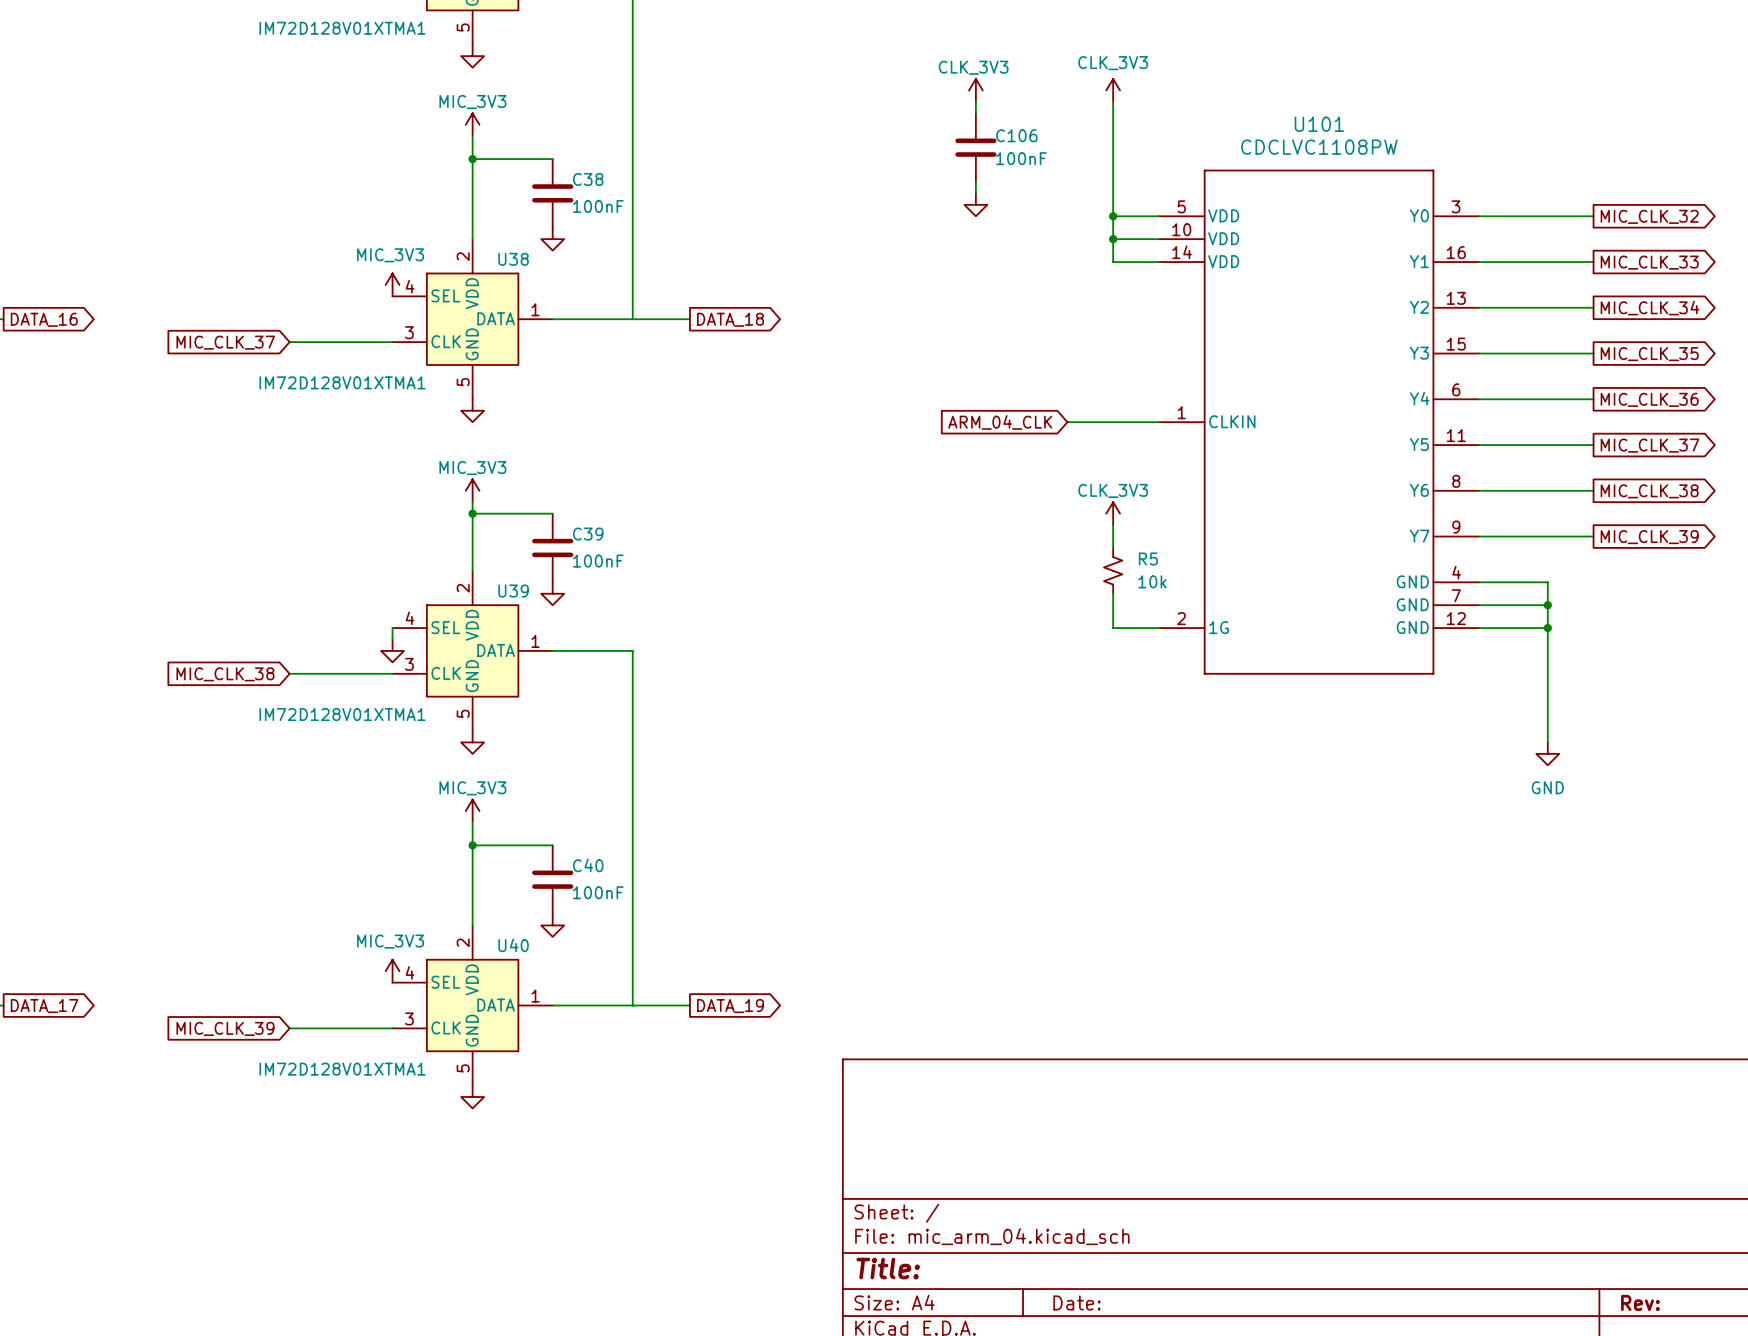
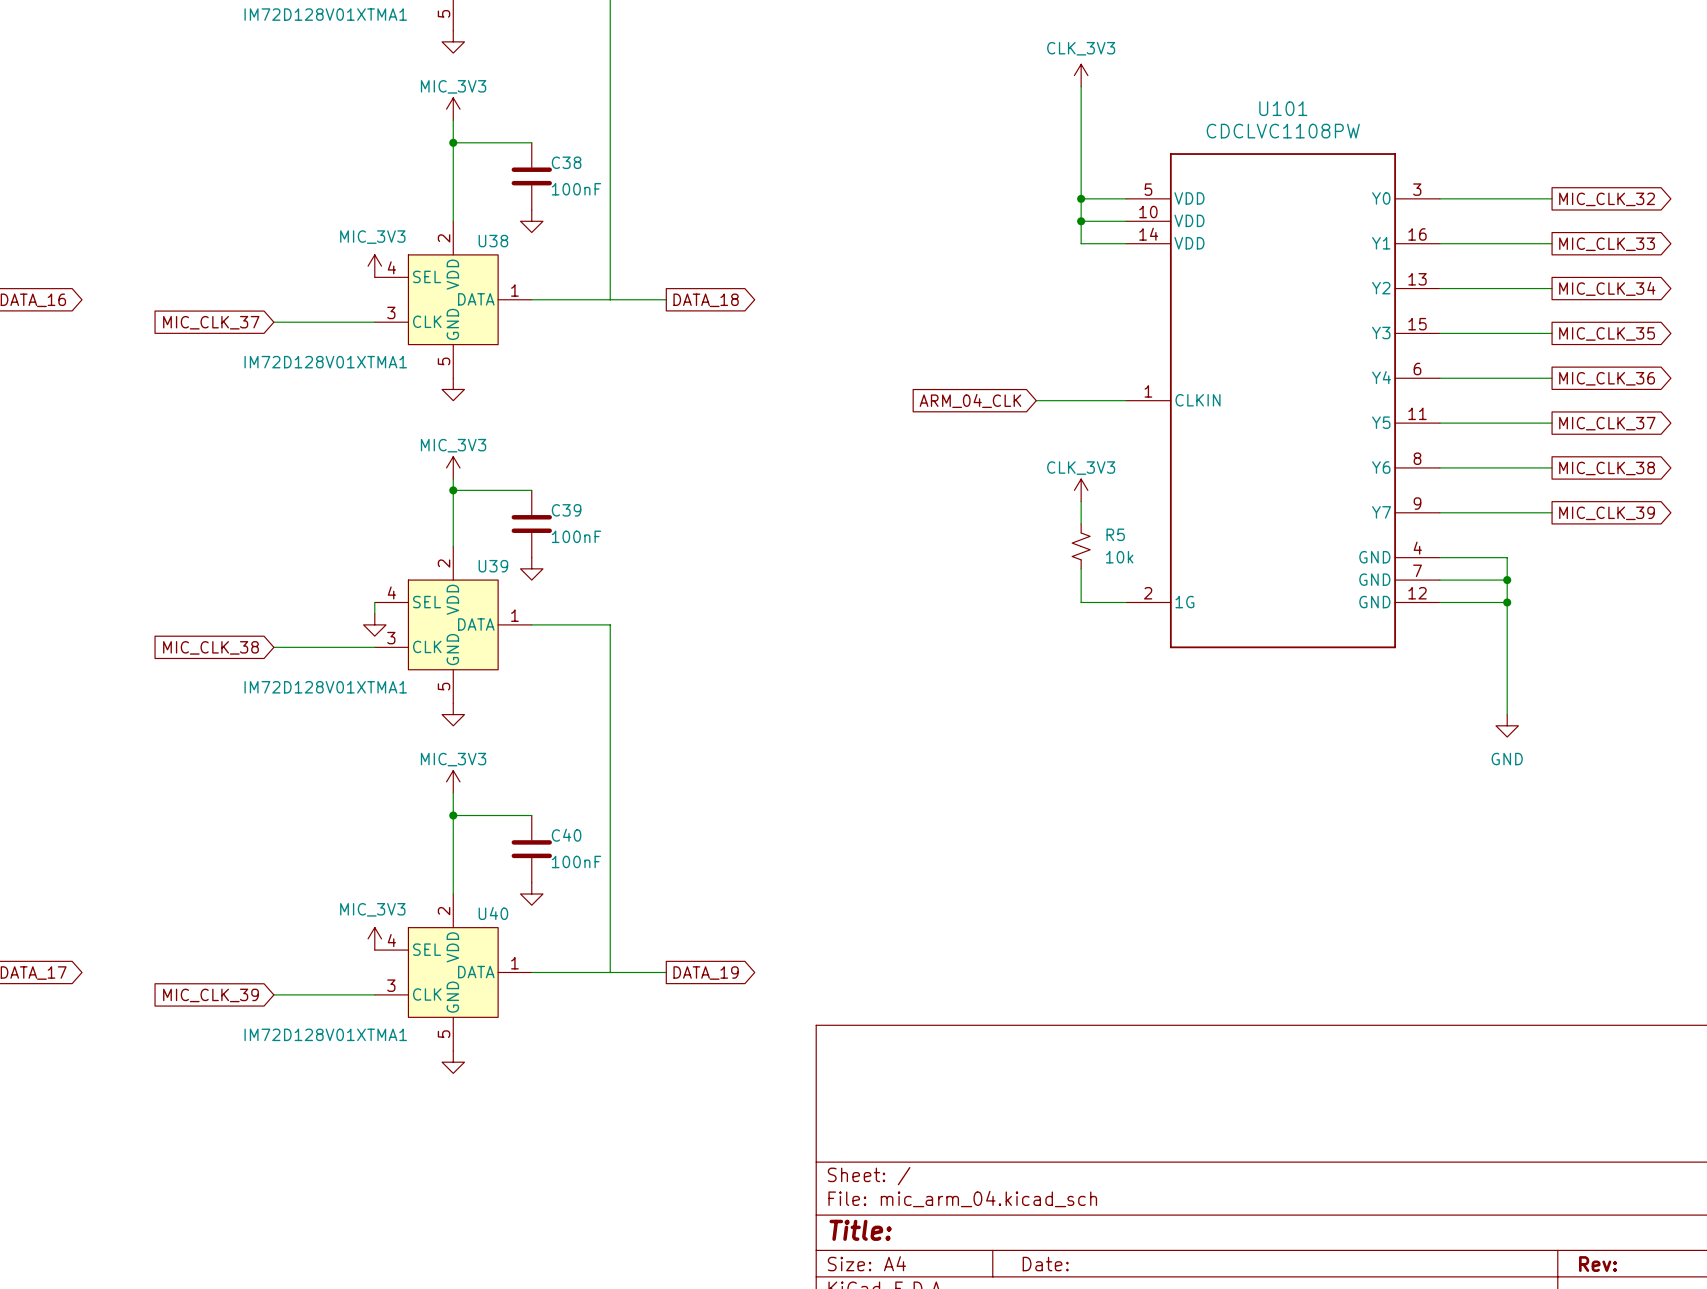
power symbol: CLK_3V3 (975, 90) -> none
wire: (975, 101) (975, 113) -> none
C106: 100nF (975, 147) -> none
wire: (975, 181) (975, 193) -> none
power symbol: (975, 204) -> none

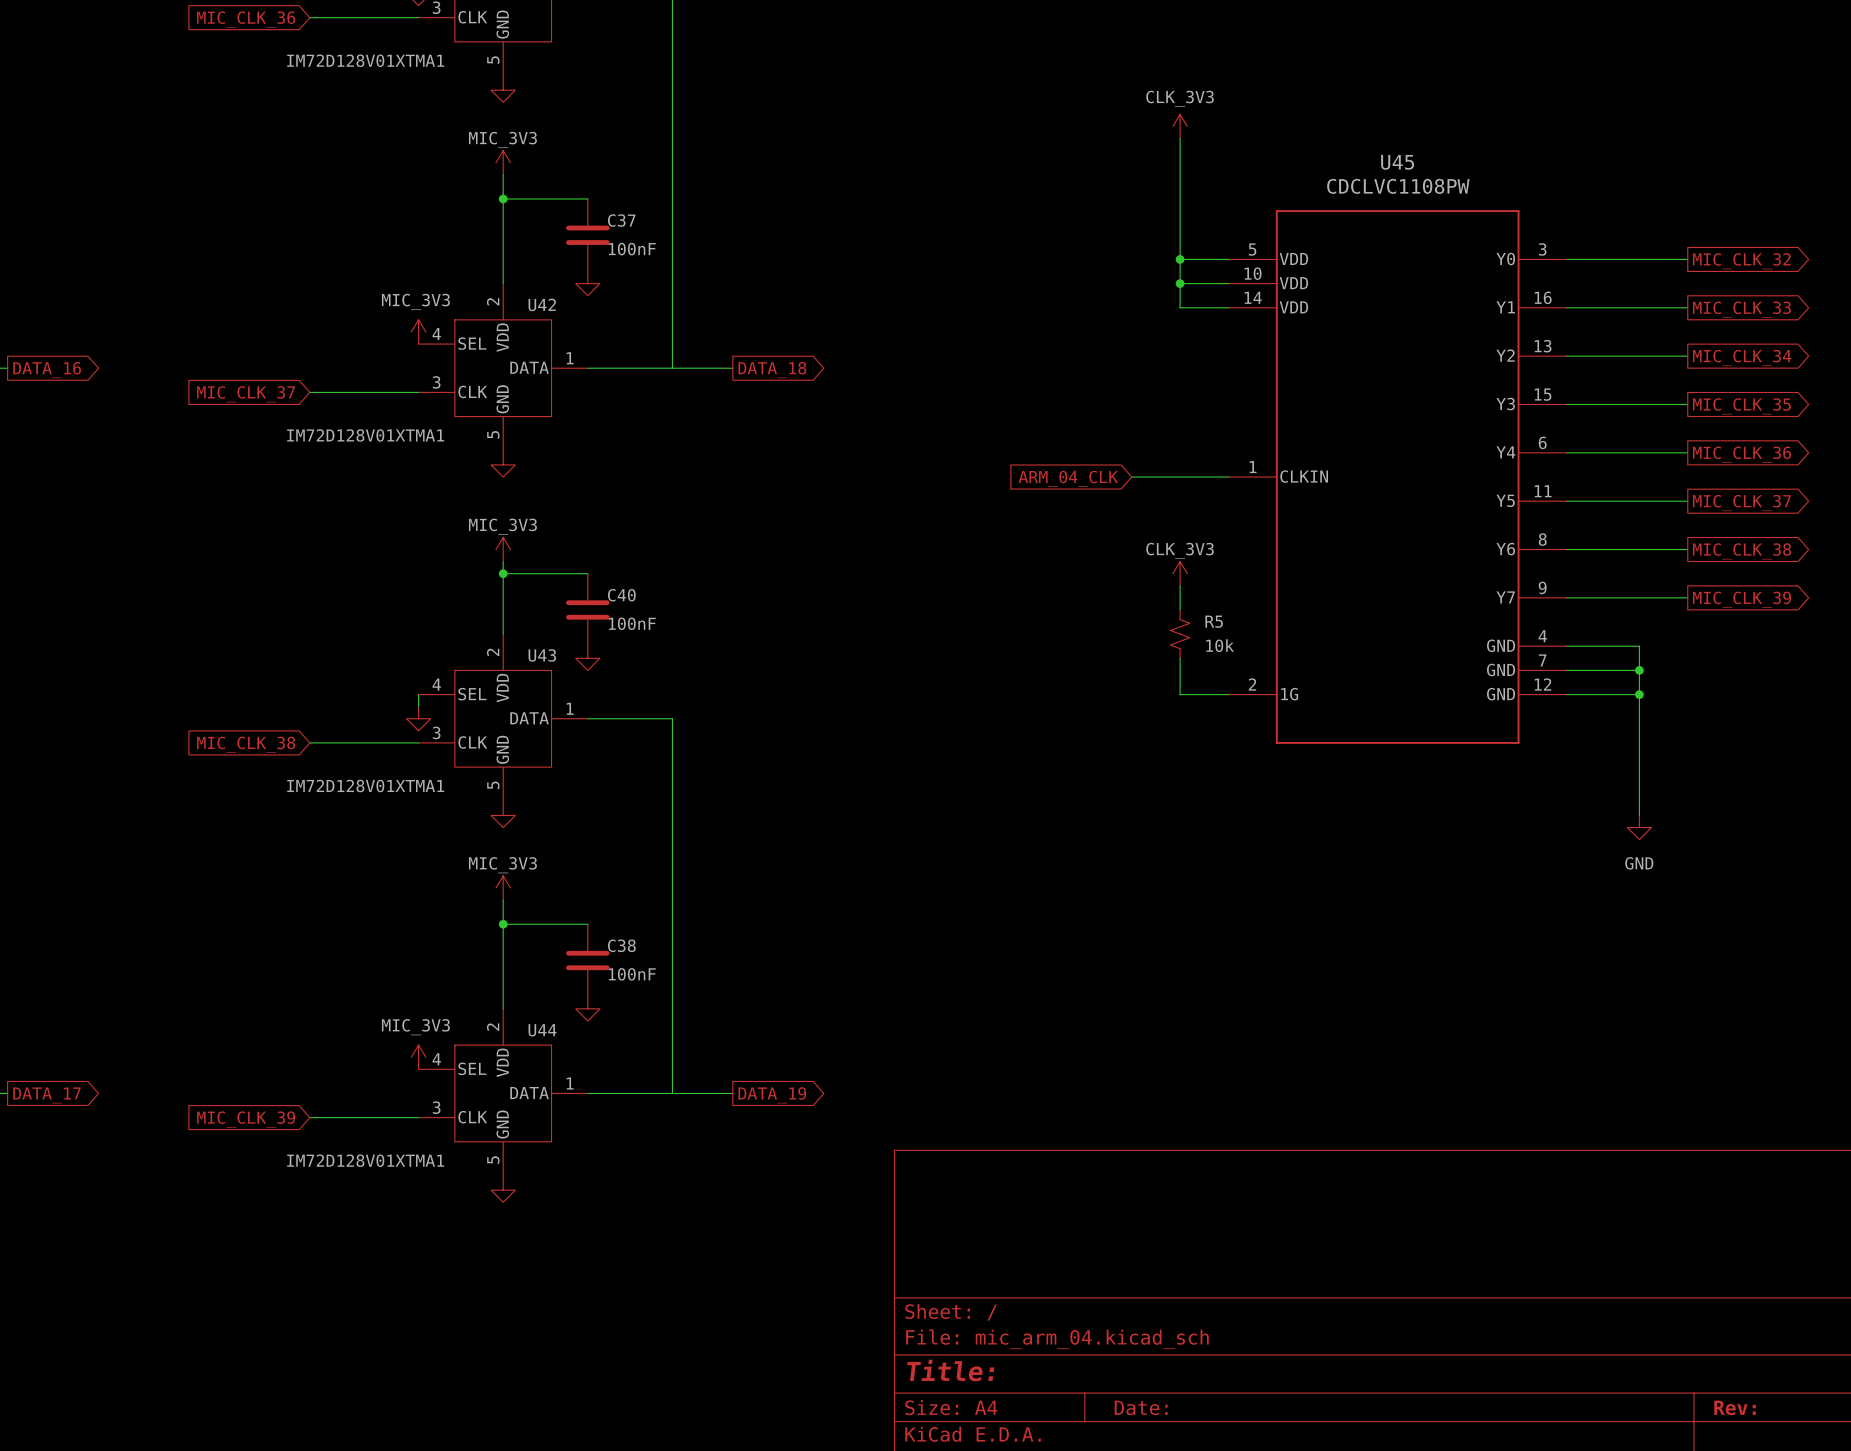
U101 name: U101 (1283, 108) -> U45 (1397, 162)
C38 name: C38 (566, 162) -> C37 (621, 220)
U38 name: U38 (493, 241) -> U42 (542, 304)
C39 name: C39 (566, 510) -> C40 (621, 595)
U39 name: U39 (493, 566) -> U43 (542, 655)
C40 name: C40 (566, 835) -> C38 (621, 945)
U40 name: U40 (493, 913) -> U44 (542, 1030)

